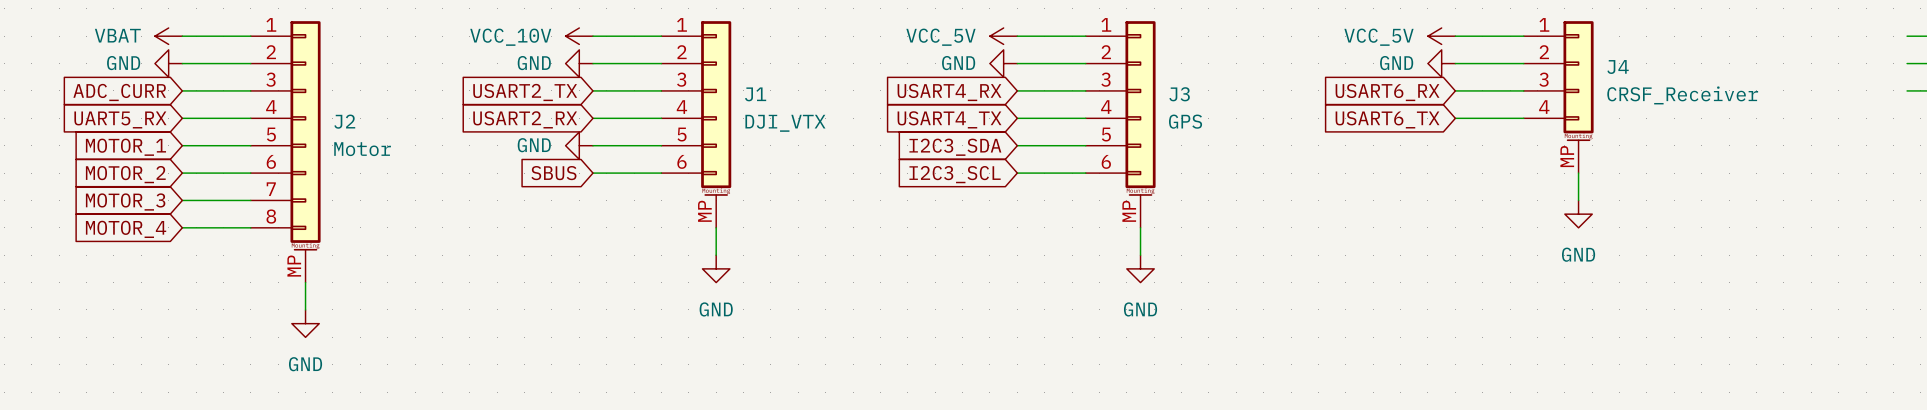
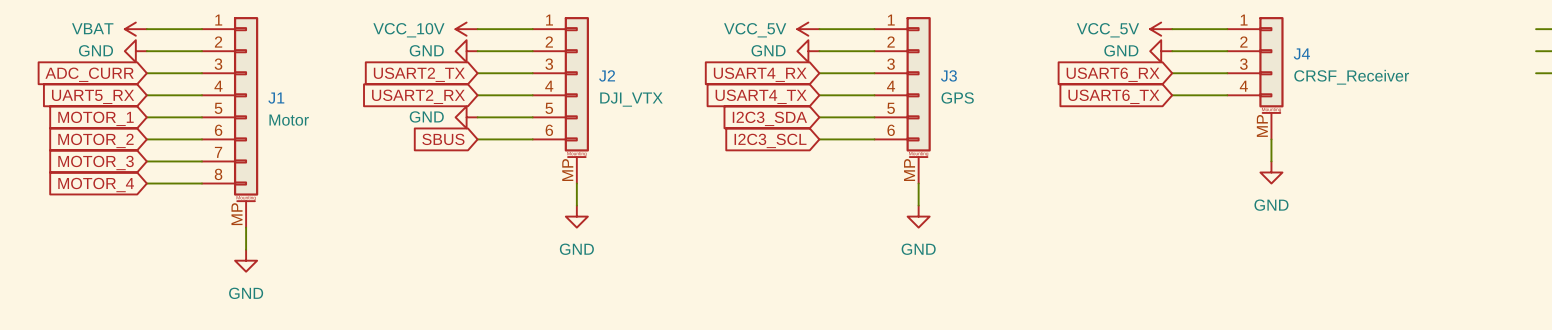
J1 name: J1 (755, 94) -> J2 (607, 75)
J2 name: J2 (344, 121) -> J1 (276, 98)

